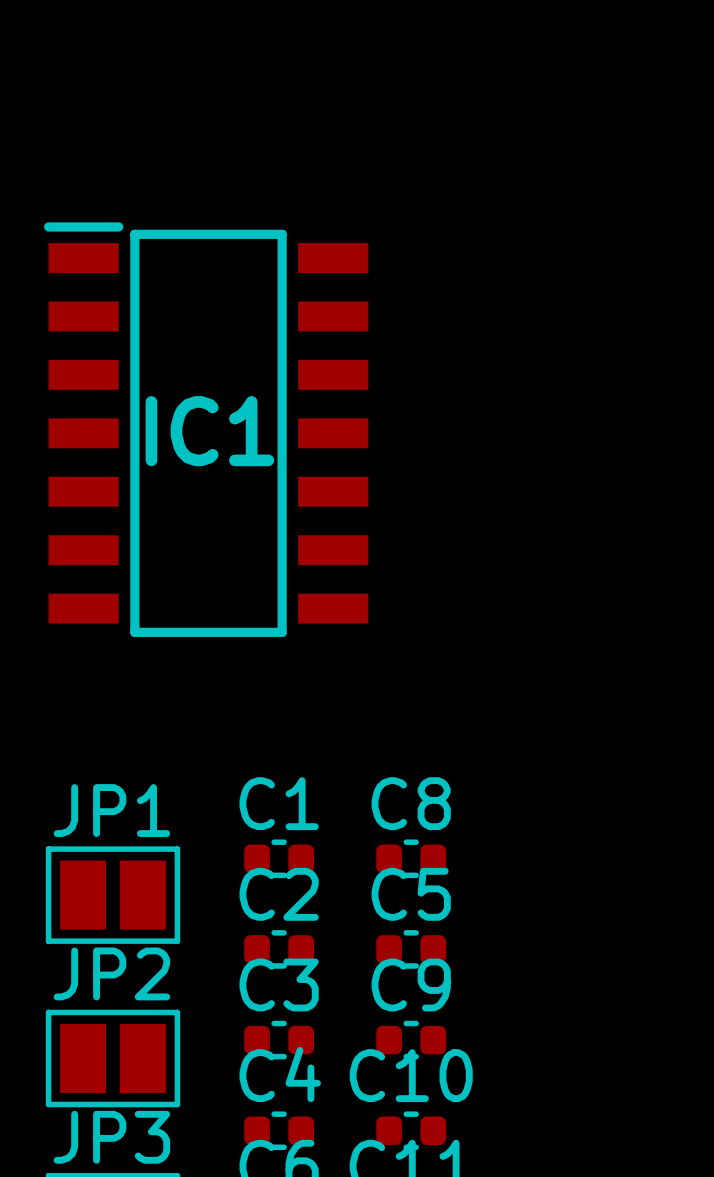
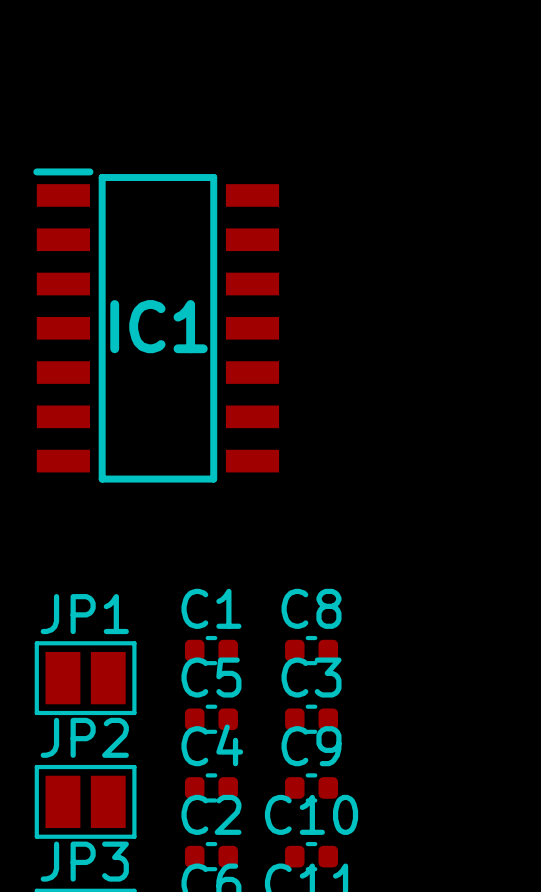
C2 name: C2 (279, 894) -> C5 (211, 677)
C5 name: C5 (411, 894) -> C3 (311, 677)
C3 name: C3 (279, 984) -> C4 (212, 745)
C4 name: C4 (280, 1074) -> C2 (211, 814)

